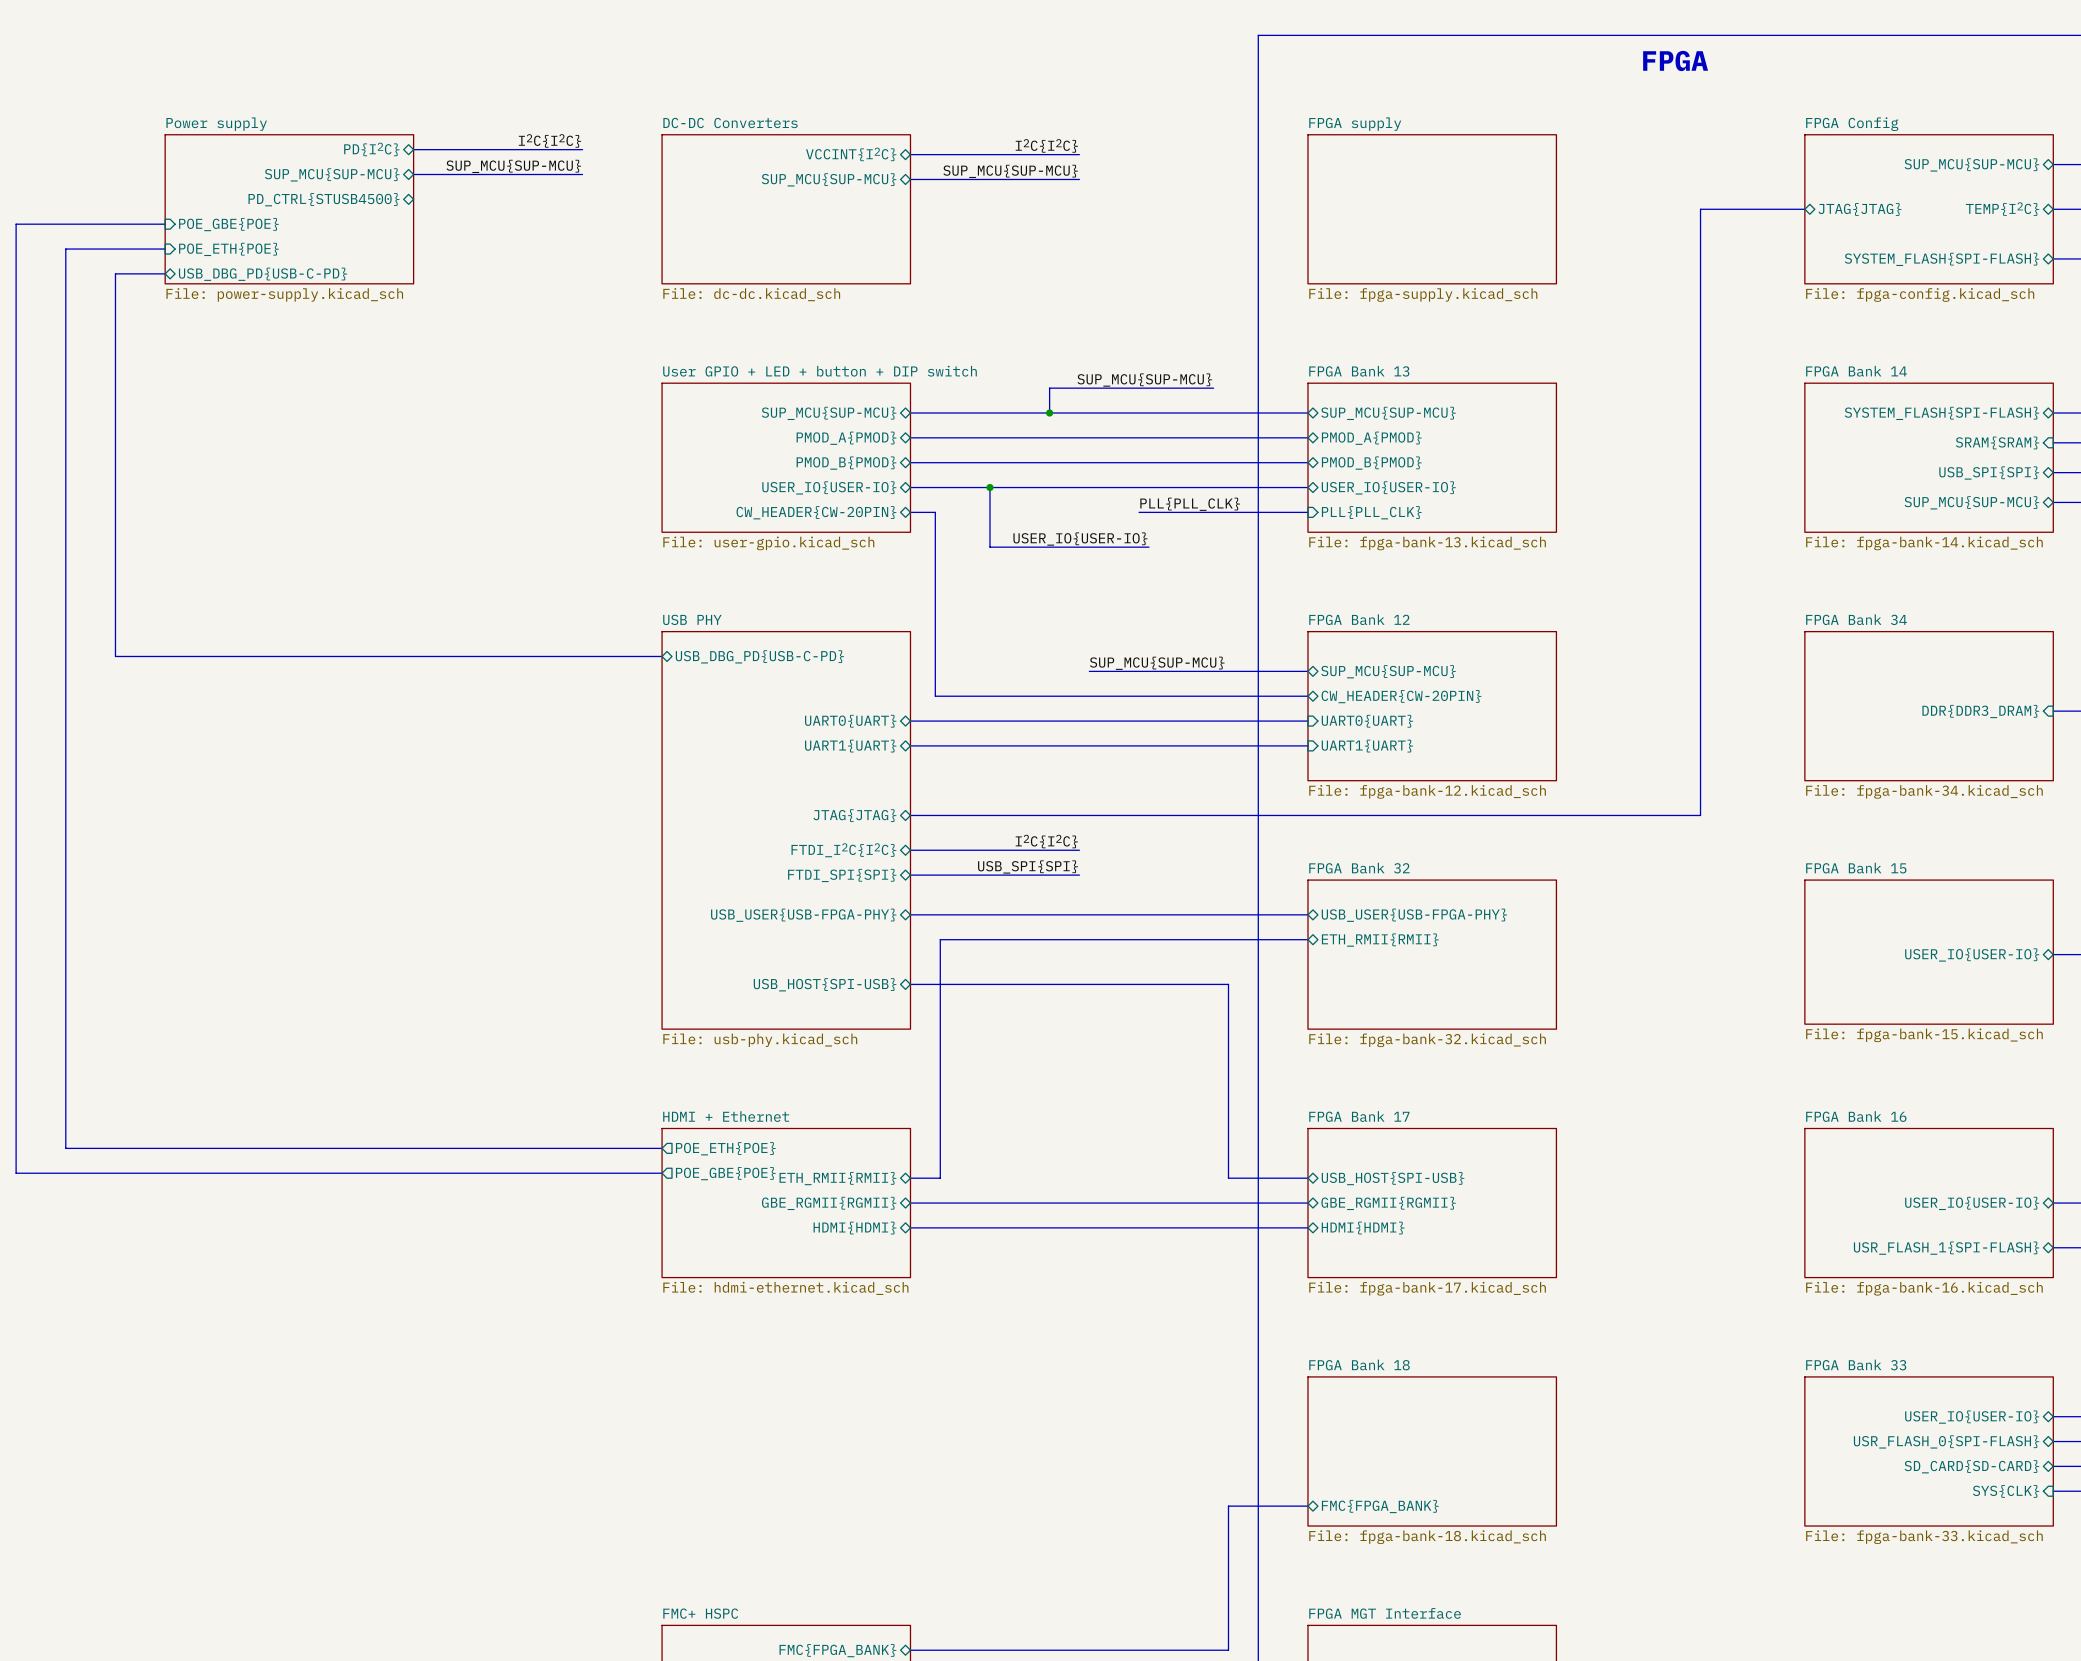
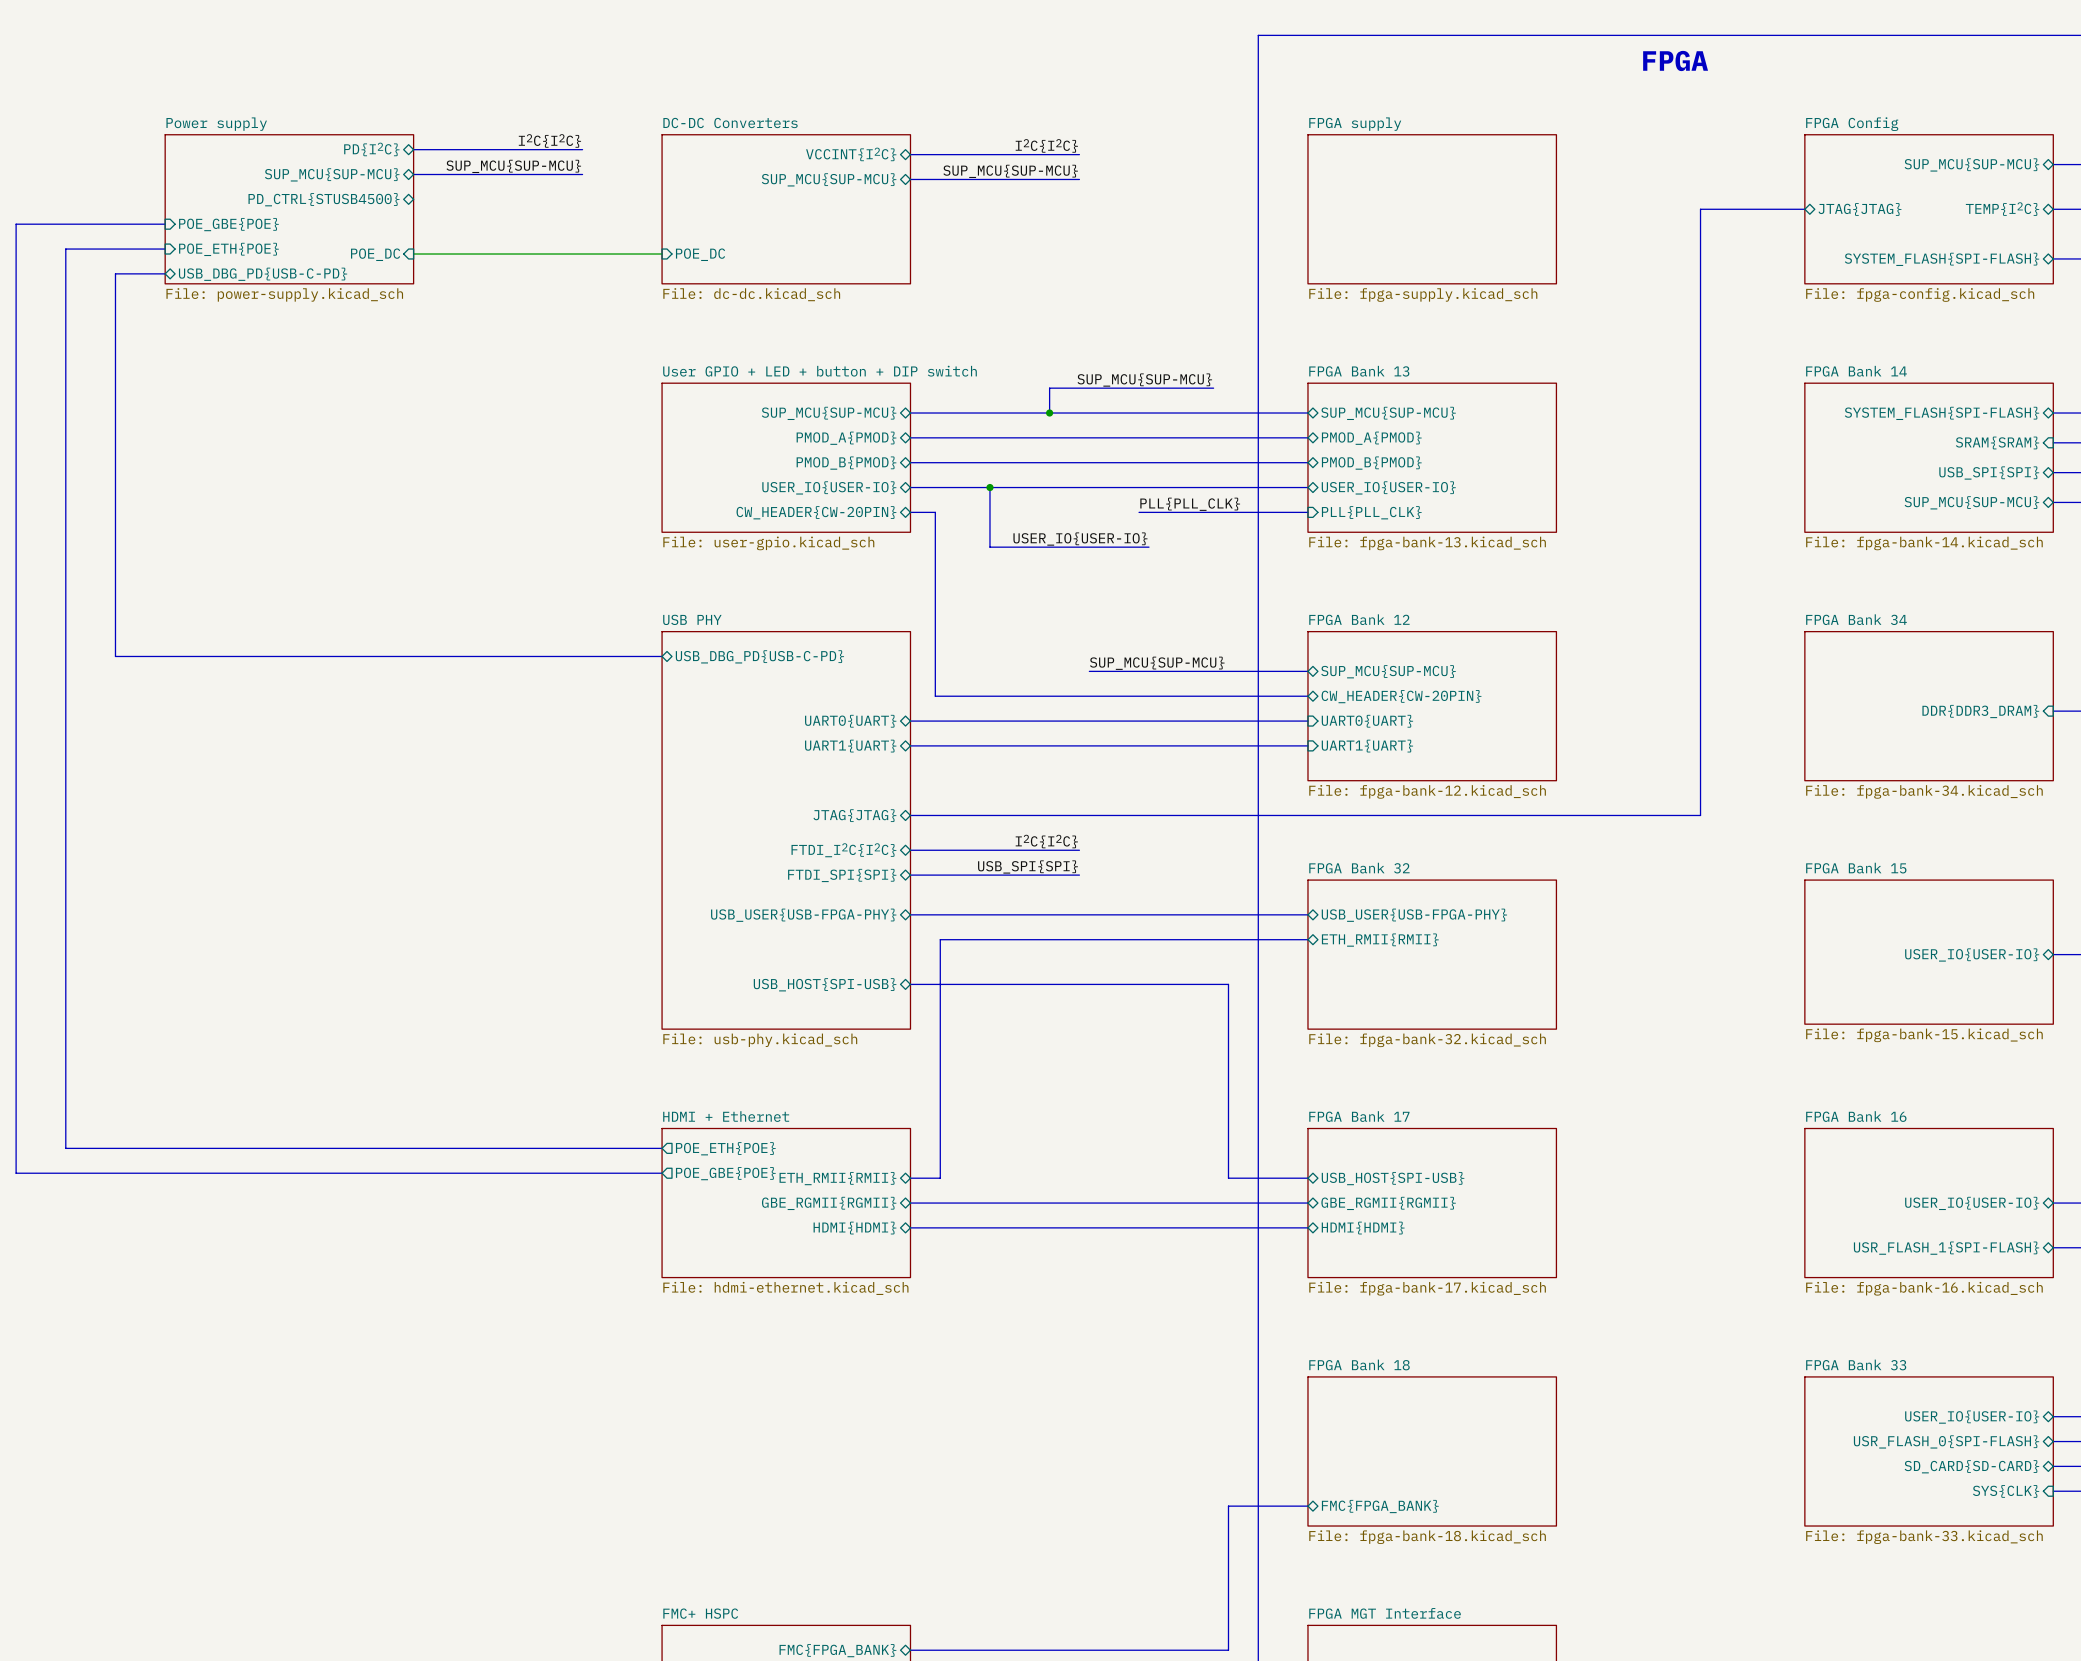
sheet pin: none -> POE_DC (375, 254)
wire: none -> (413, 254) (662, 254)
sheet pin: none -> POE_DC (700, 254)

